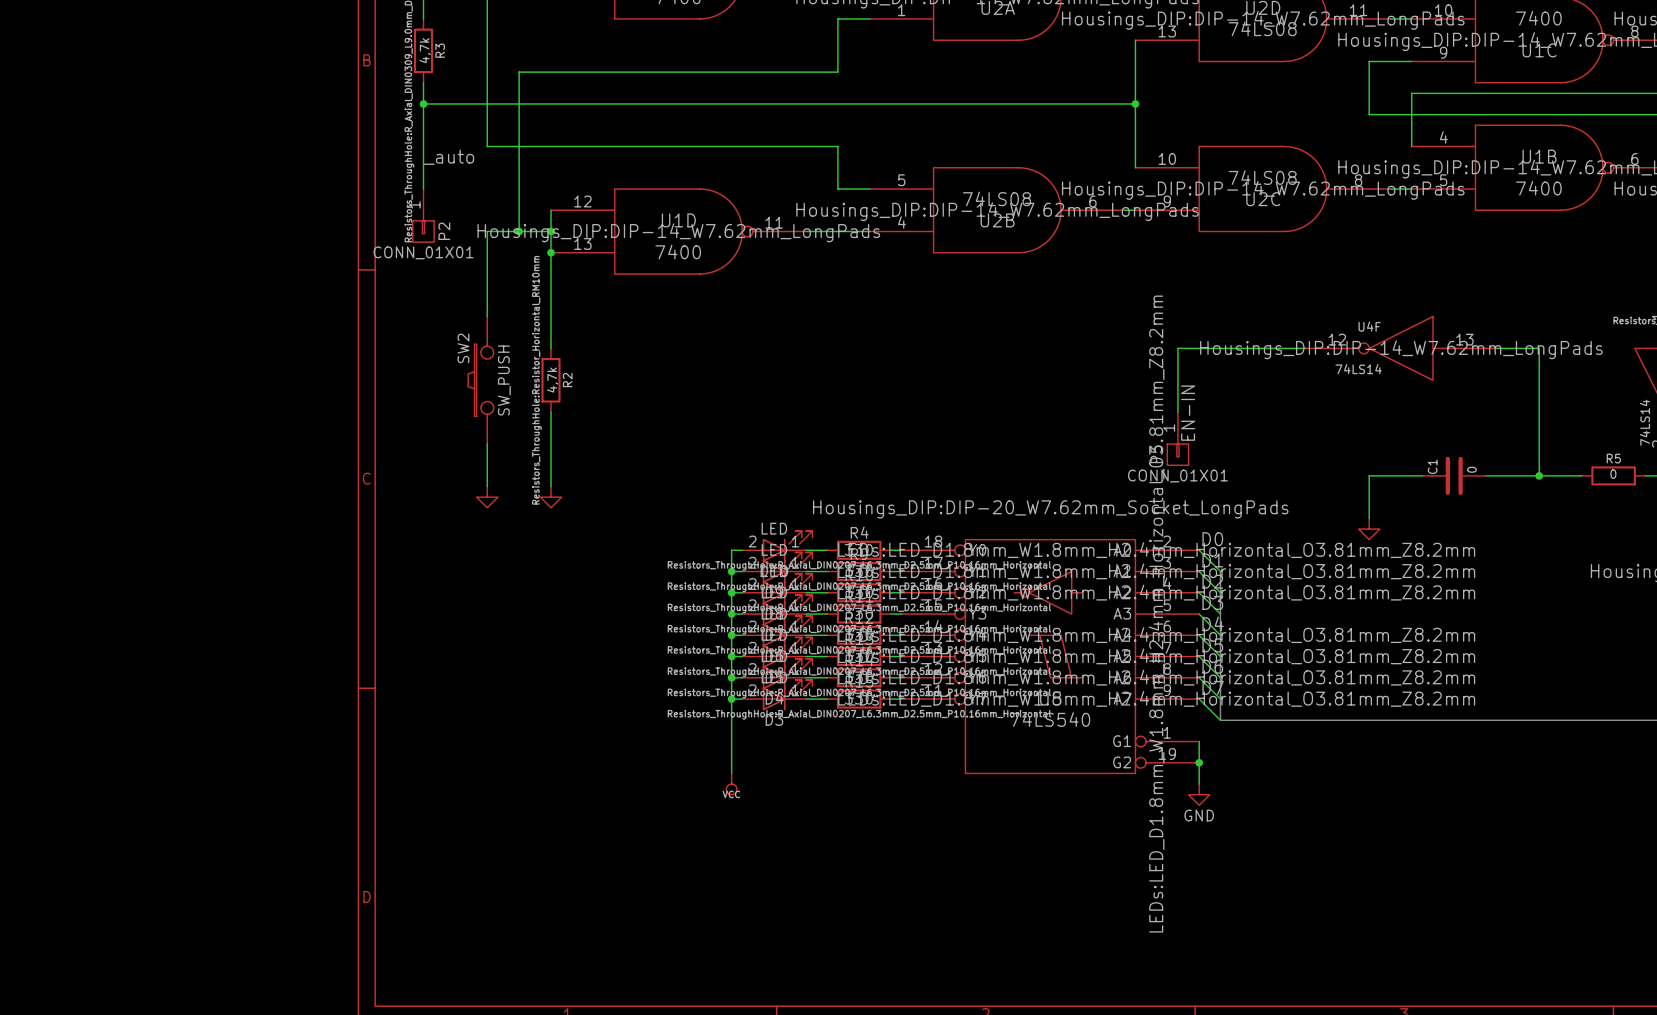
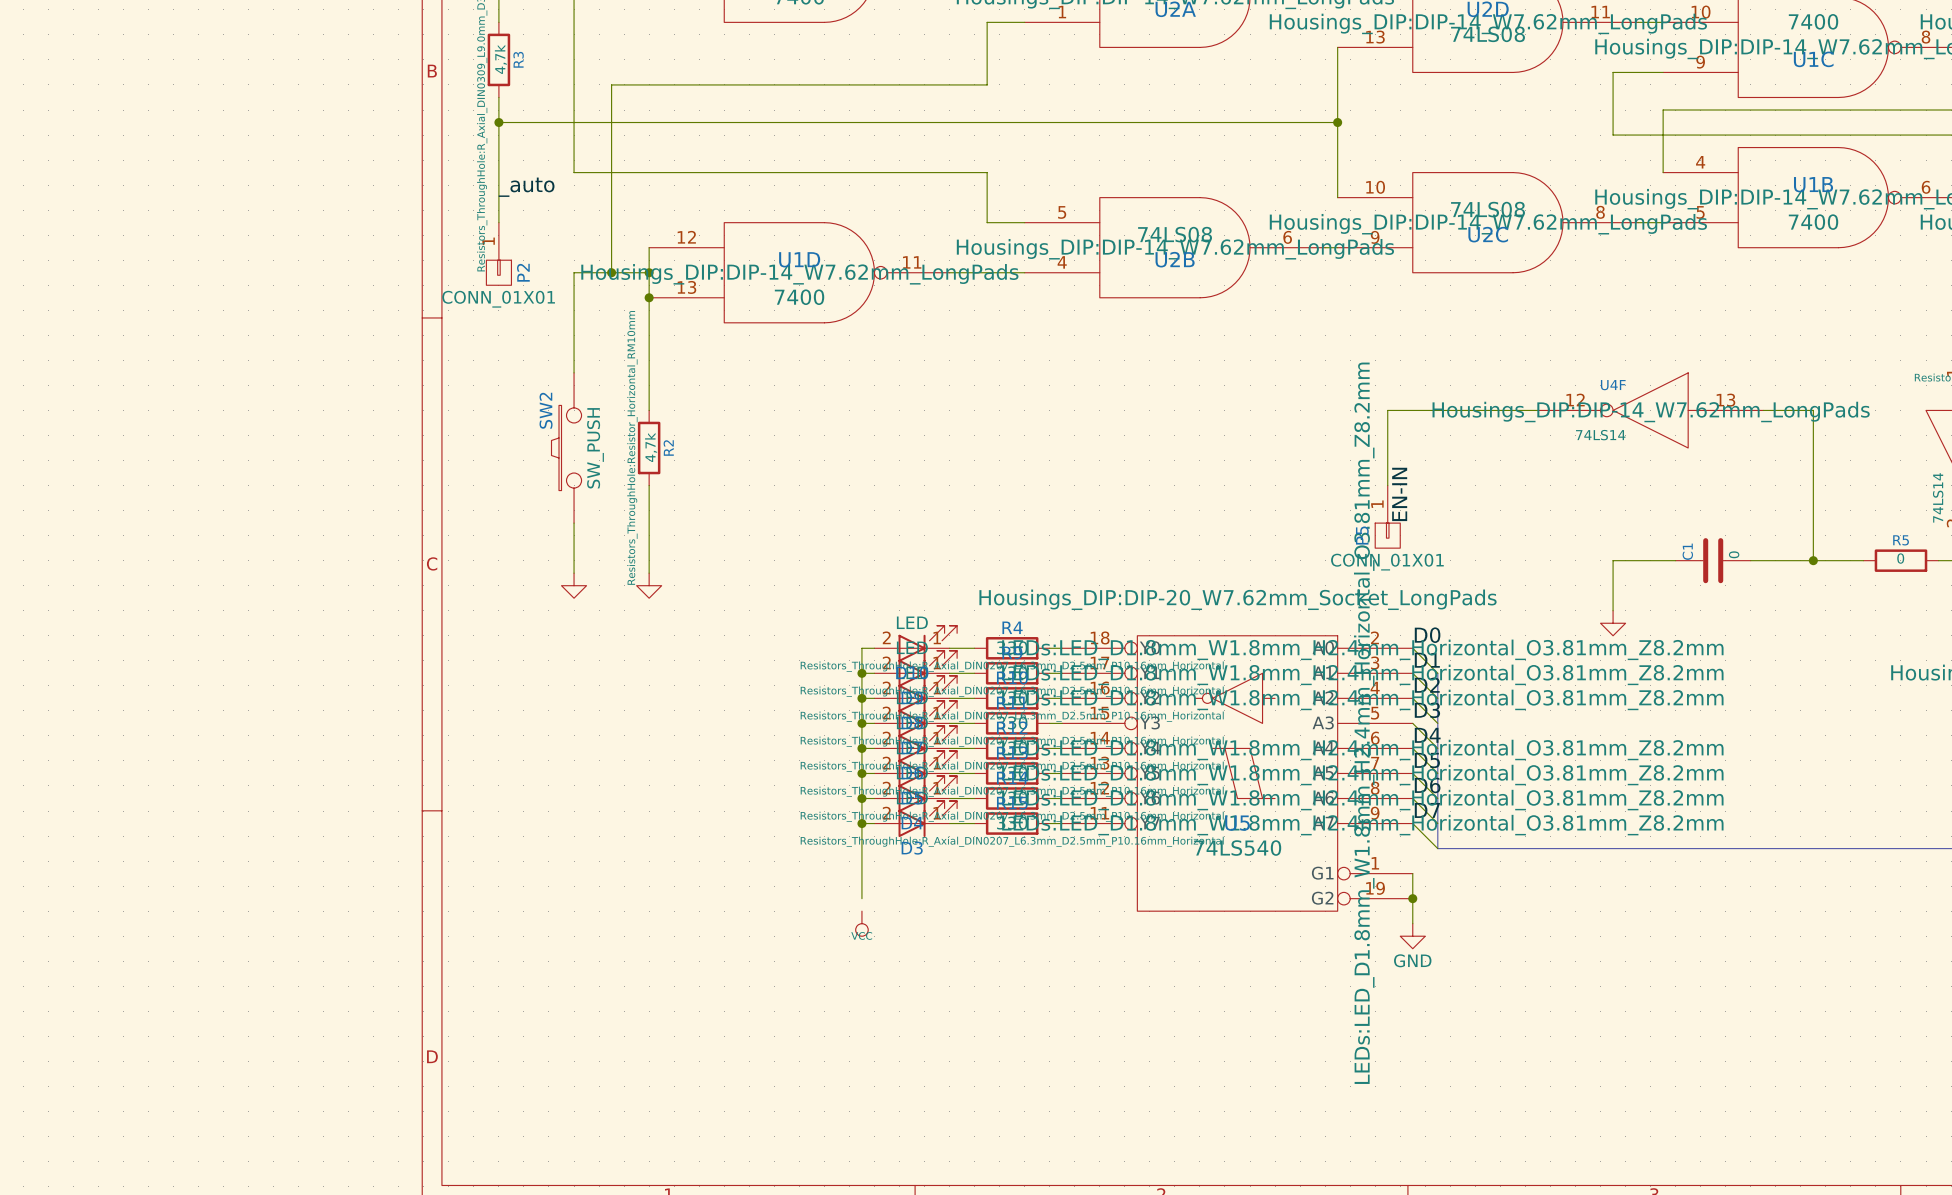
wire: (731, 762) (731, 773) -> none

